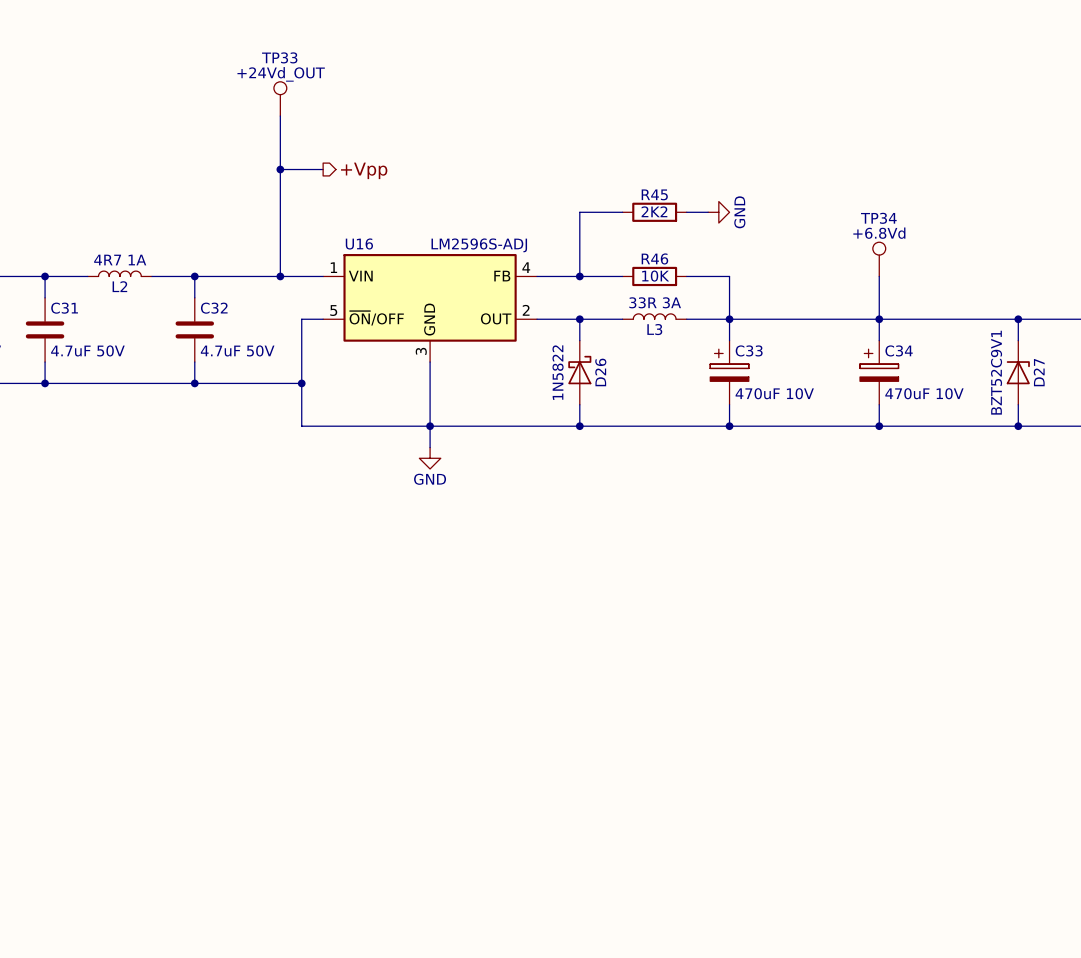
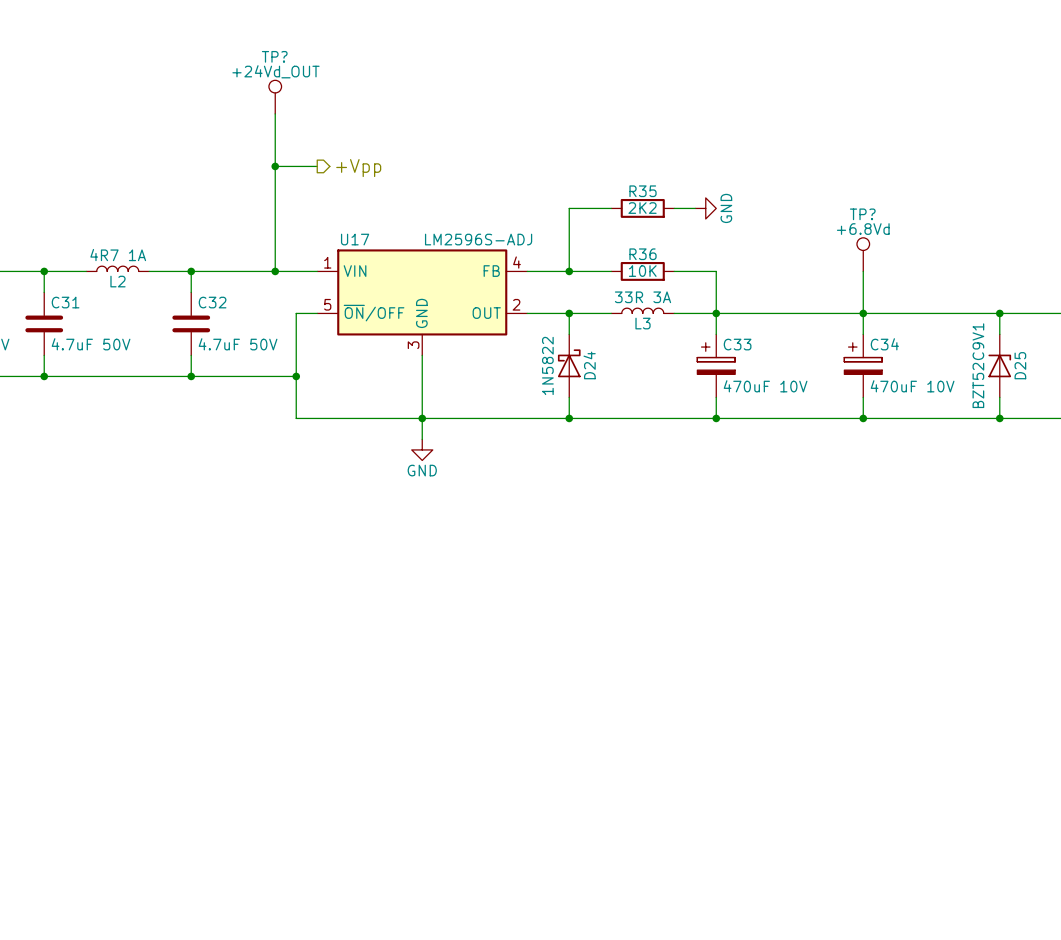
TP33 name: TP33 (279, 57) -> TP? (274, 56)
R45 name: R45 (654, 194) -> R35 (643, 191)
TP34 name: TP34 (878, 218) -> TP? (862, 214)
U16 name: U16 (359, 243) -> U17 (355, 239)
R46 name: R46 (654, 258) -> R36 (643, 254)
D26 name: D26 (600, 372) -> D24 (589, 365)
D27 name: D27 (1039, 372) -> D25 (1020, 365)

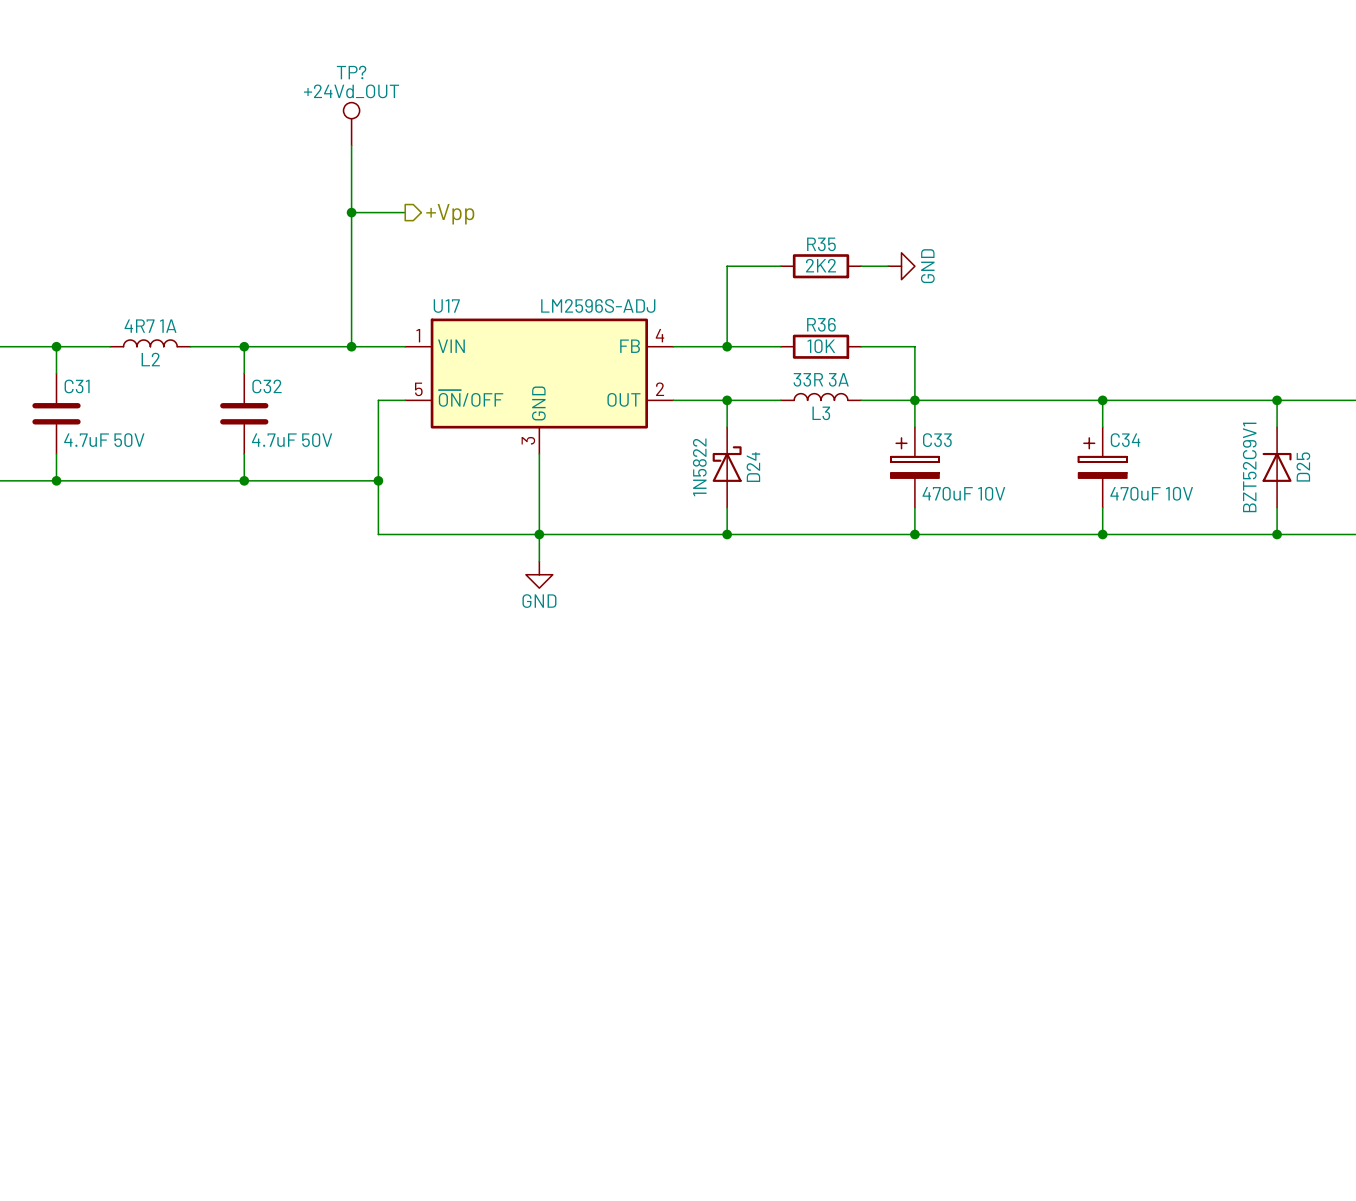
TP?: +6.8Vd (863, 254) -> none
wire: (863, 271) (863, 313) -> none

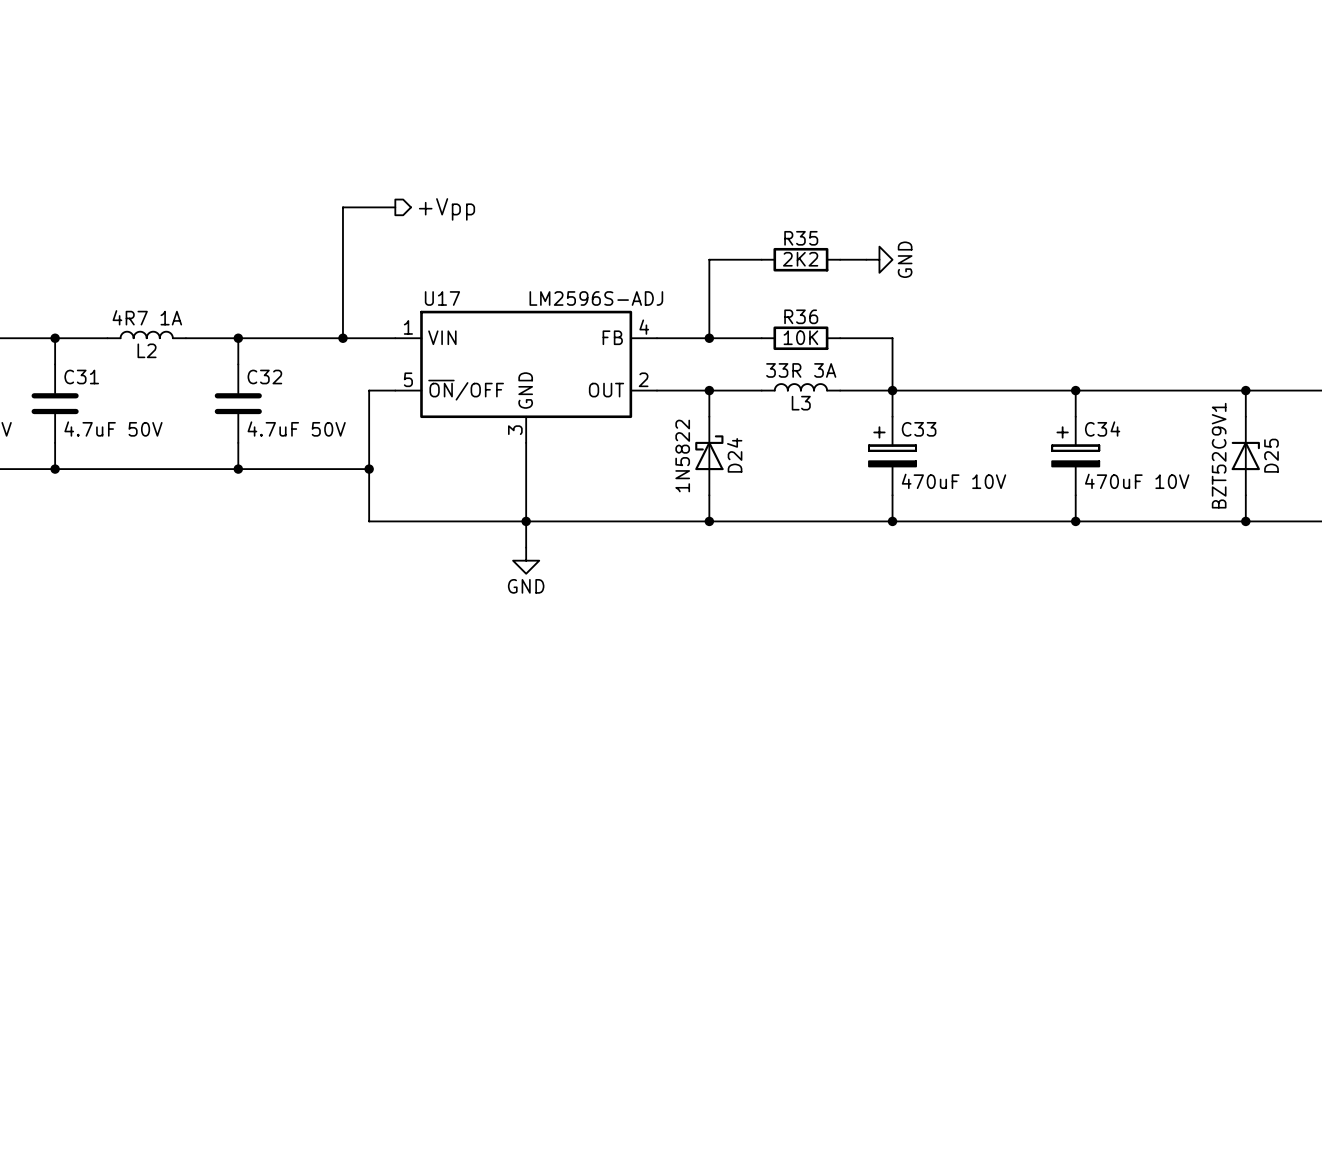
TP?: +24Vd_OUT (351, 124) -> none
wire: (351, 145) (351, 212) -> none
junction: (351, 212) -> none

